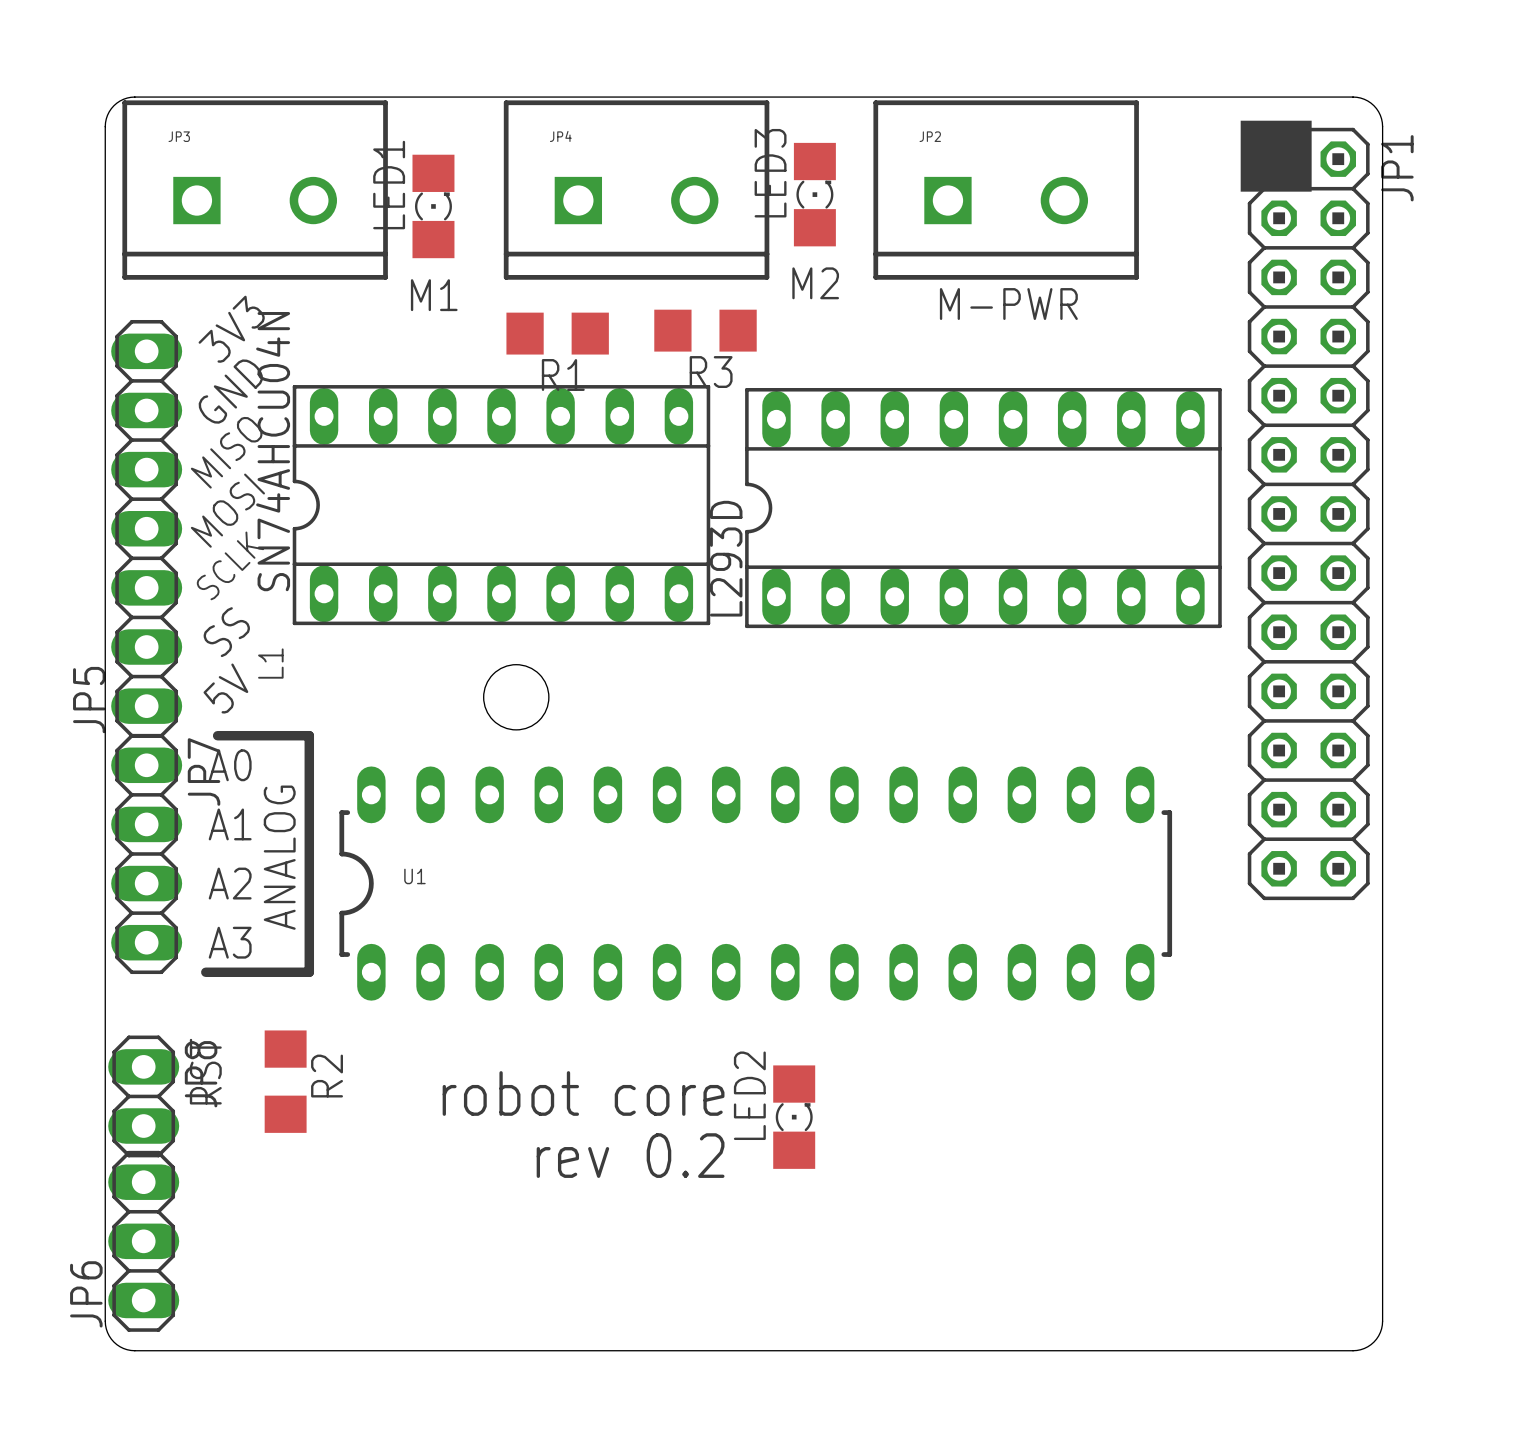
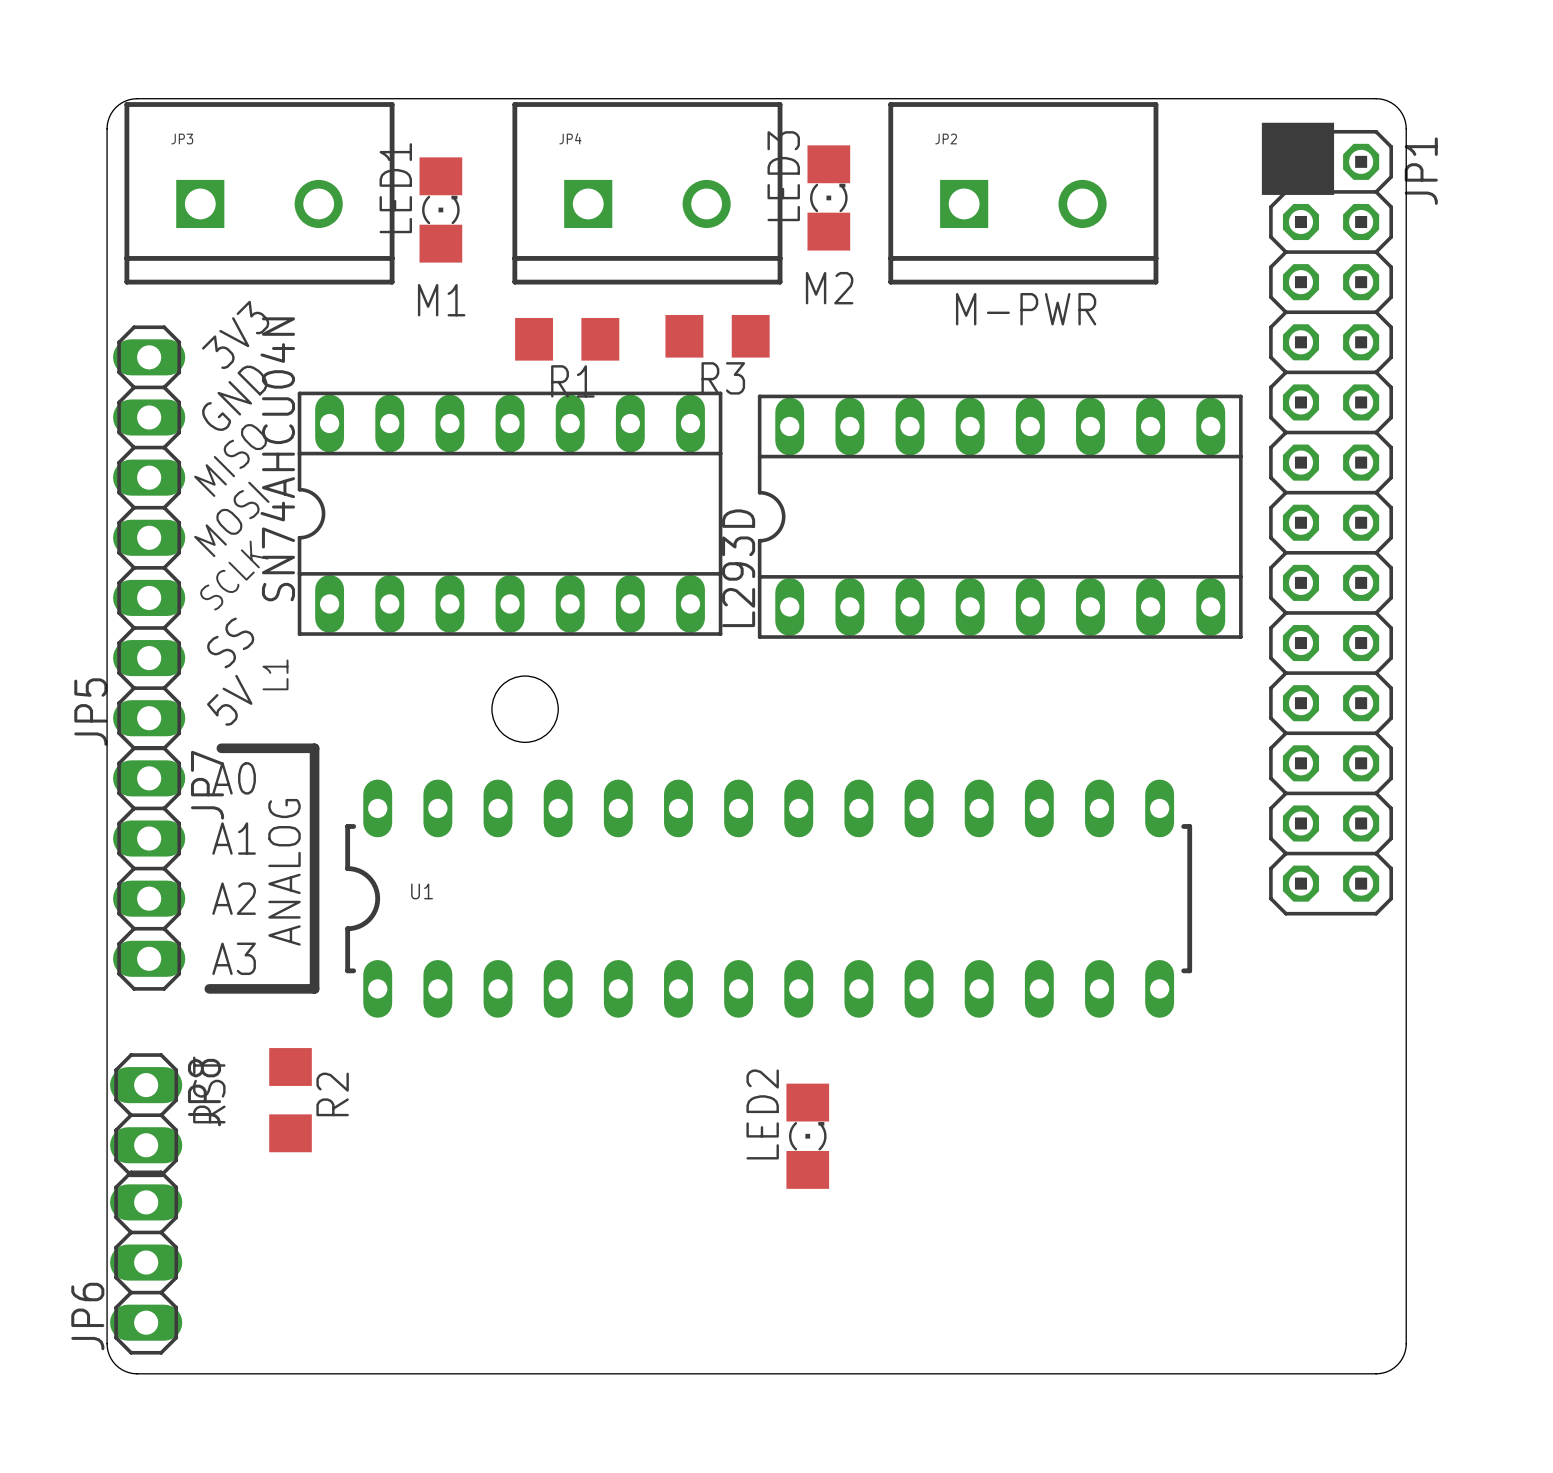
text: robot core (583, 1093) -> none
text: rev 0.2 (630, 1155) -> none

